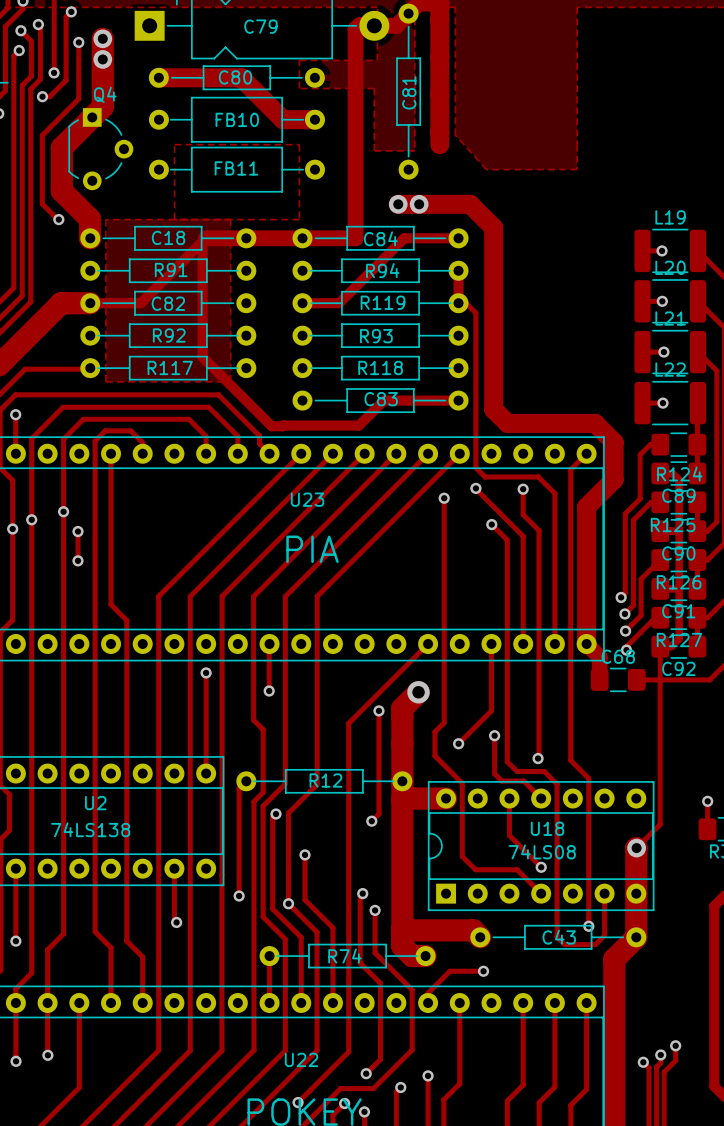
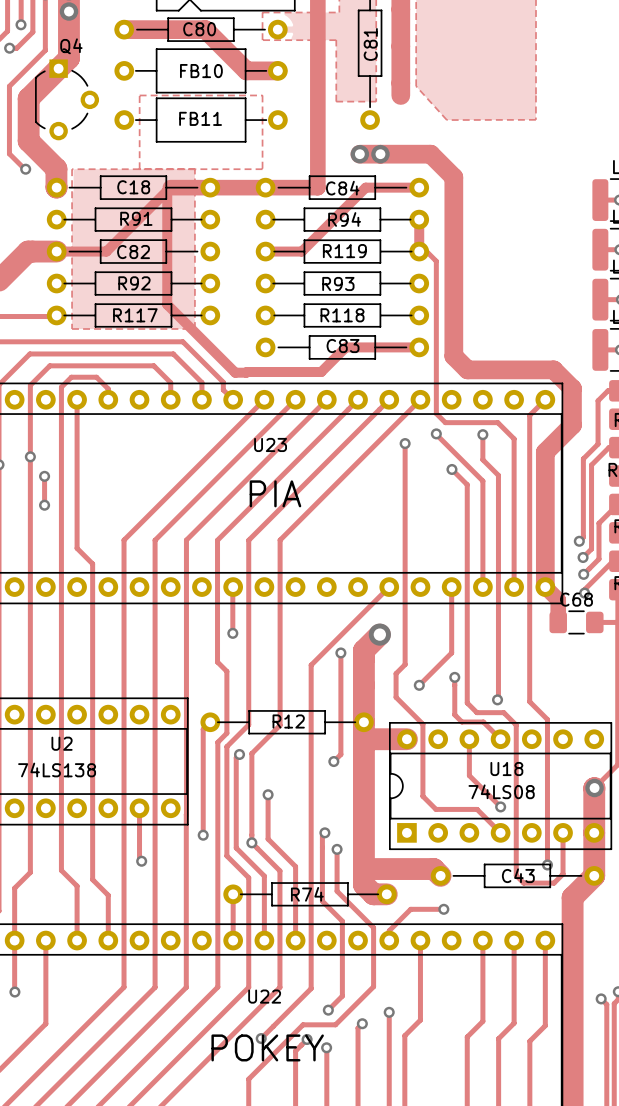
track: (206, 672) (206, 773) -> none
via: (206, 672) -> none

